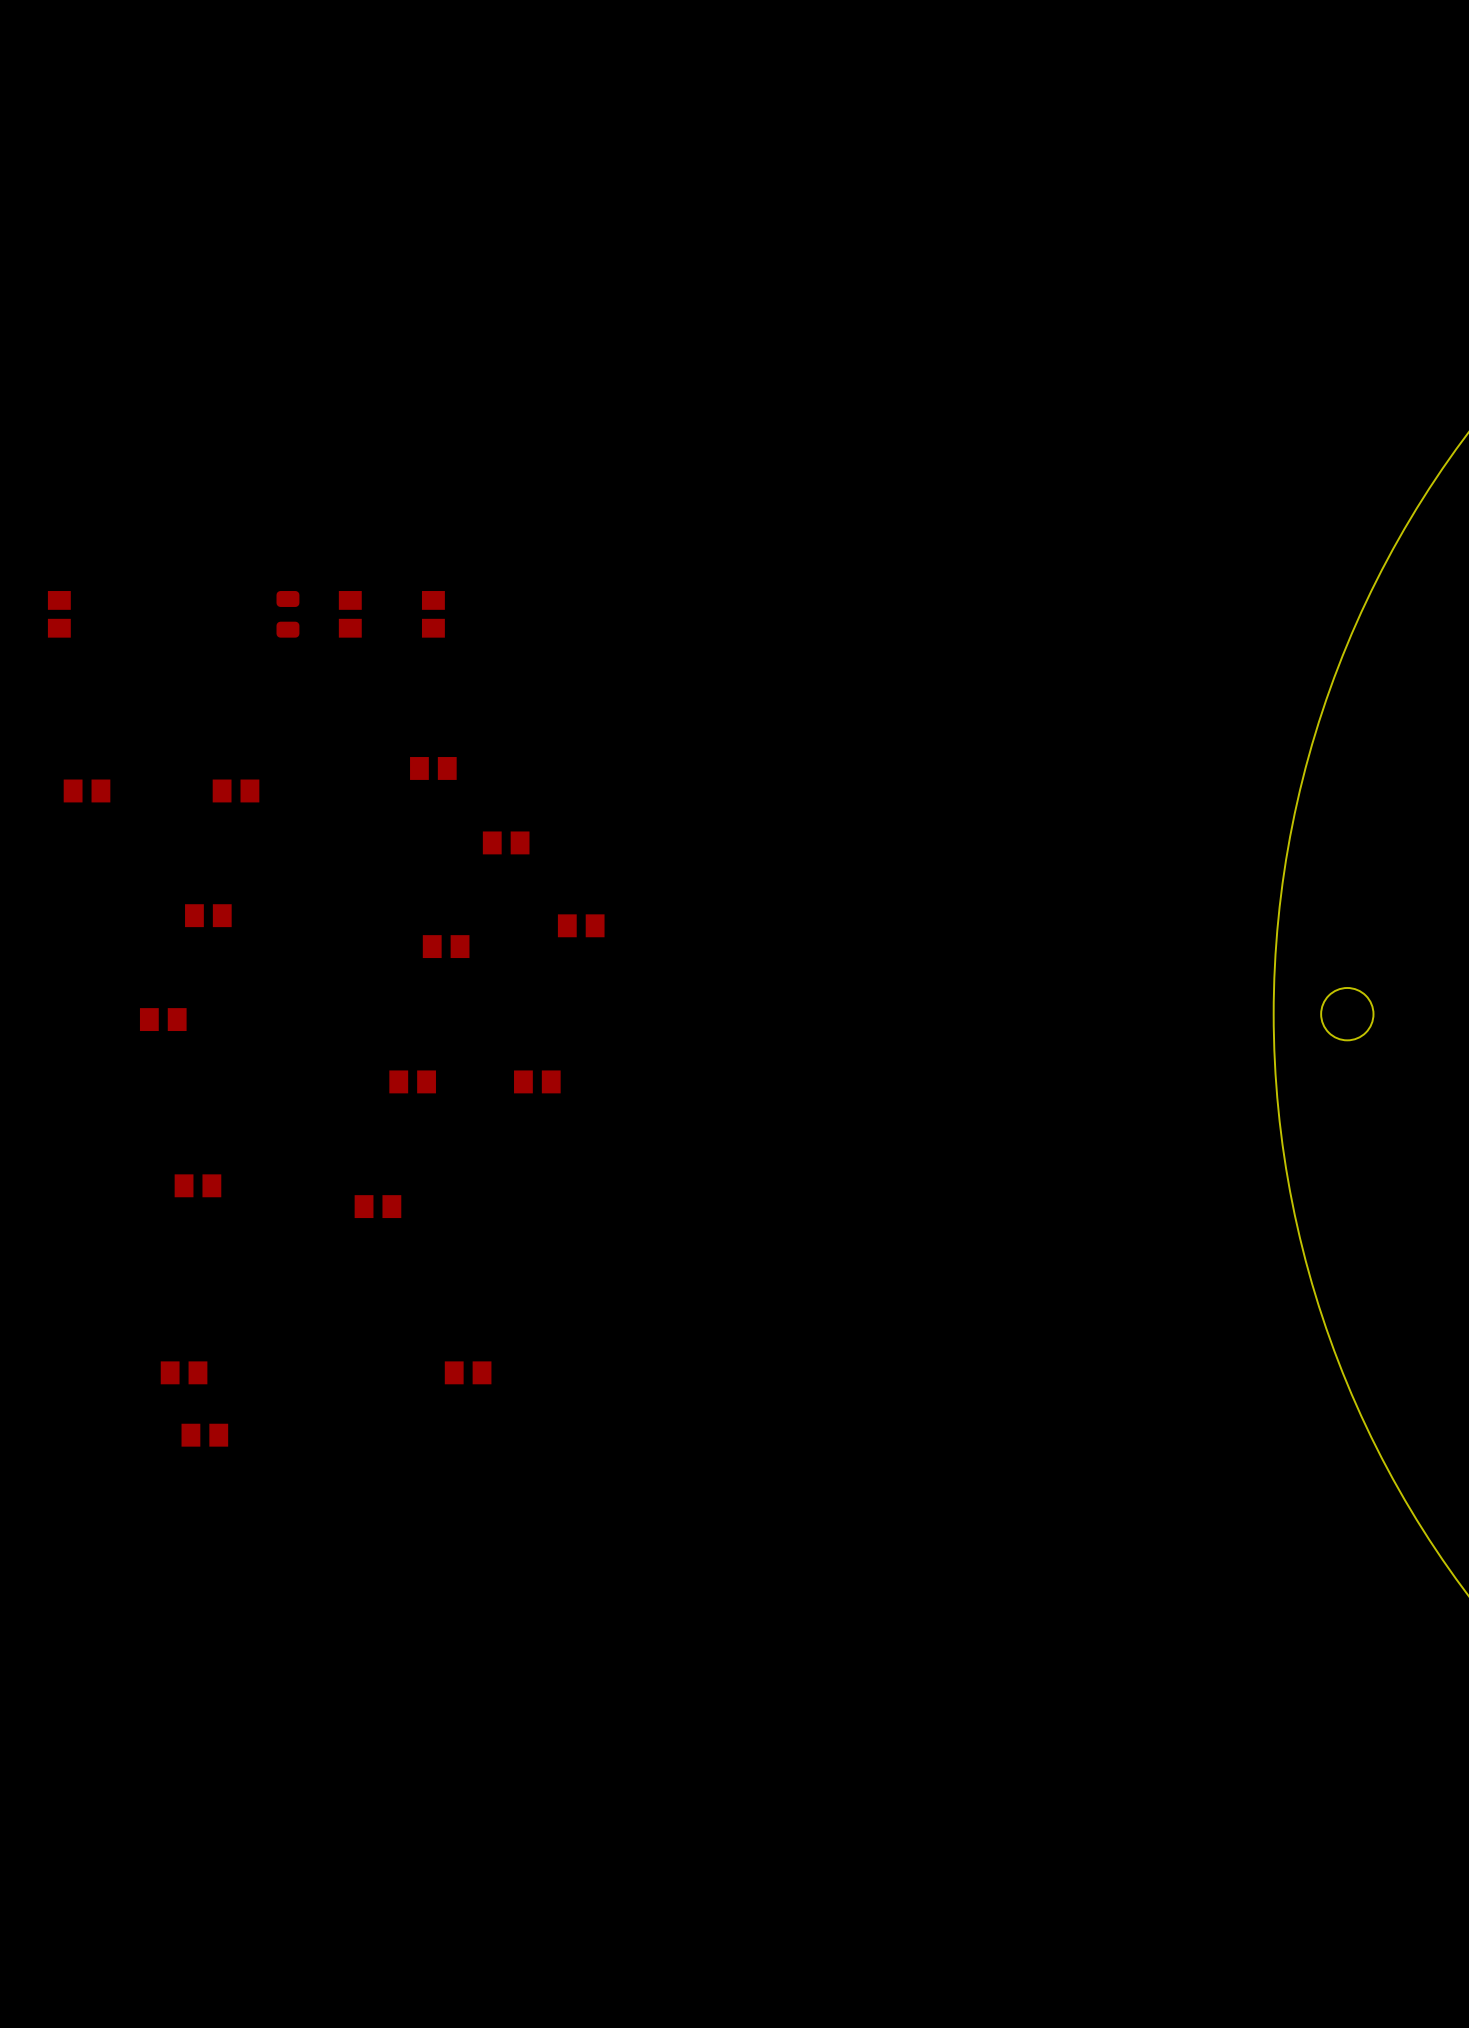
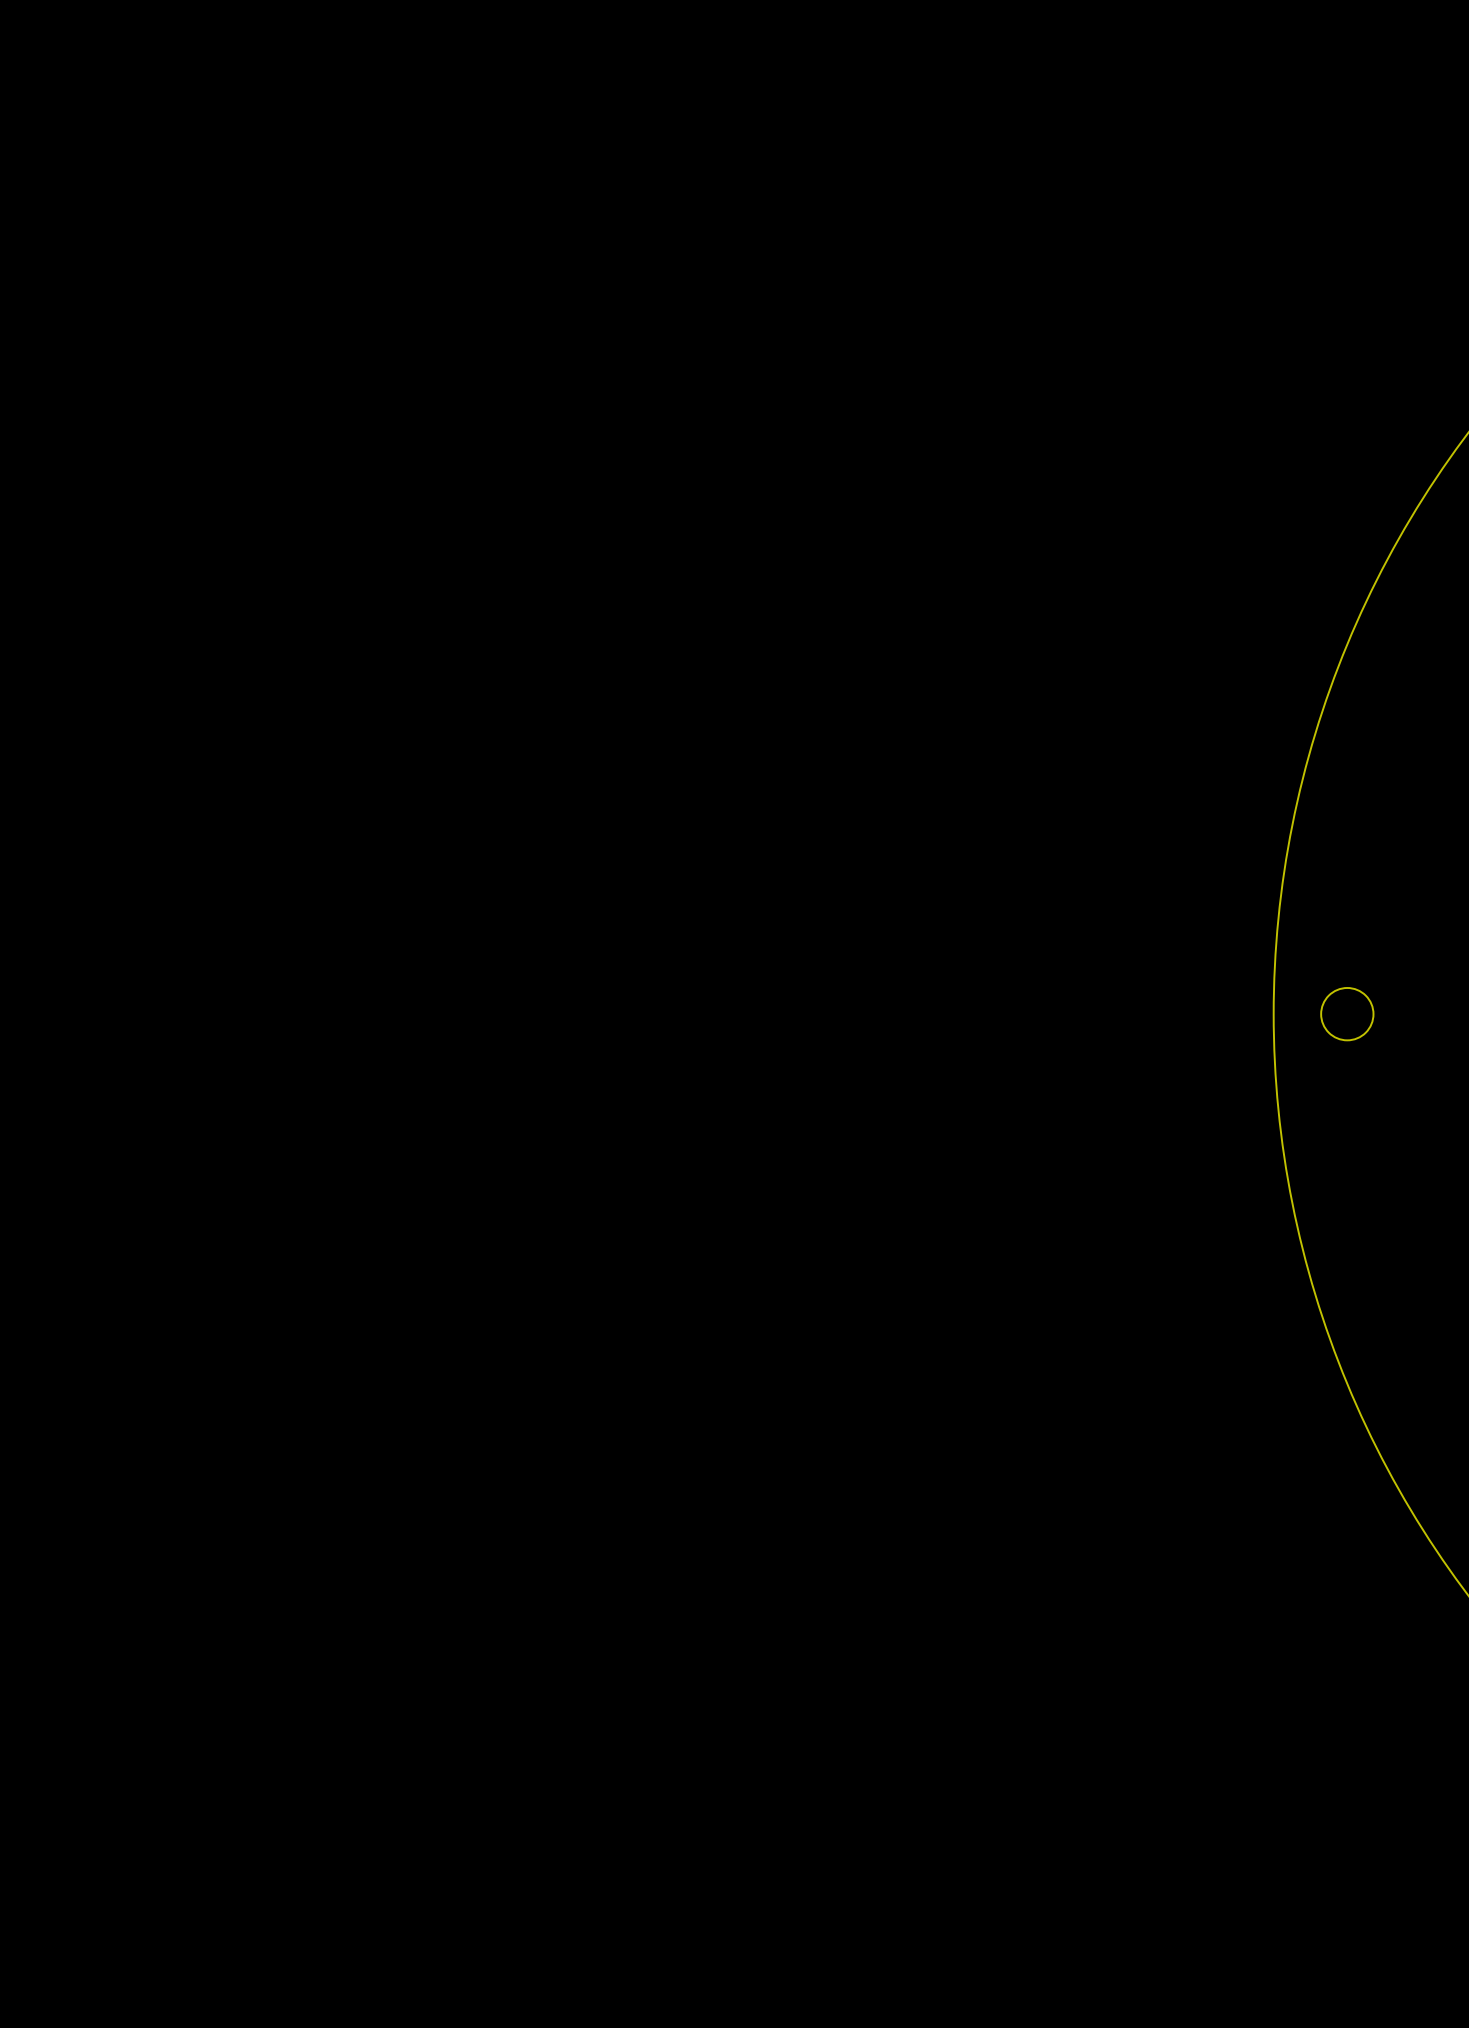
part: (59, 614) -> none
part: (287, 614) -> none
part: (350, 614) -> none
part: (433, 614) -> none
part: (433, 768) -> none
part: (87, 790) -> none
part: (236, 790) -> none
part: (506, 842) -> none
part: (208, 915) -> none
part: (581, 925) -> none
part: (446, 946) -> none
part: (163, 1019) -> none
part: (412, 1081) -> none
part: (537, 1081) -> none
part: (197, 1185) -> none
part: (377, 1206) -> none
part: (184, 1372) -> none
part: (468, 1372) -> none
part: (204, 1435) -> none

